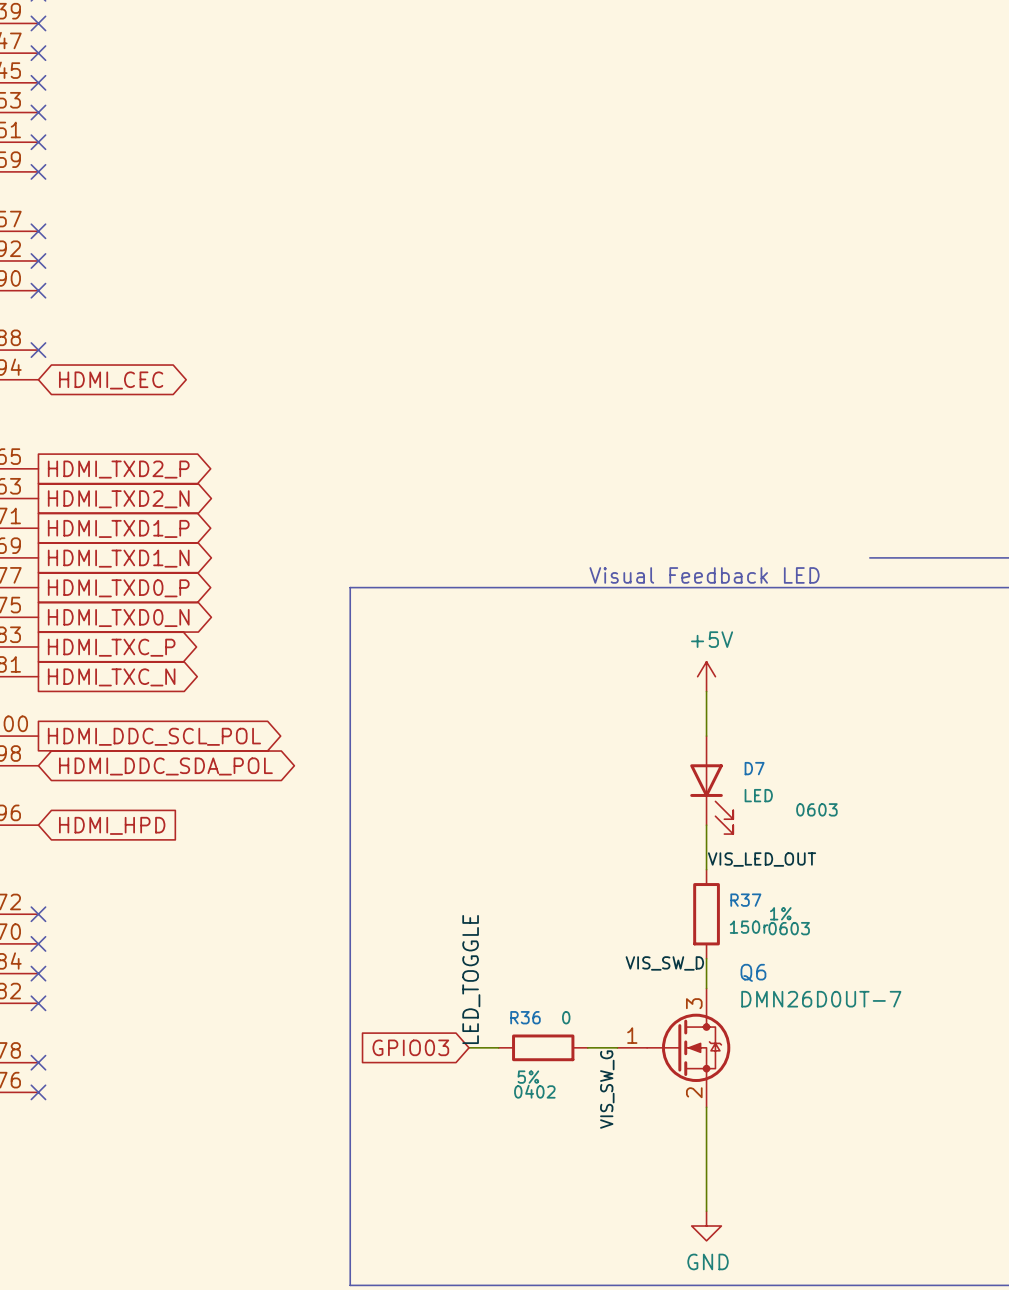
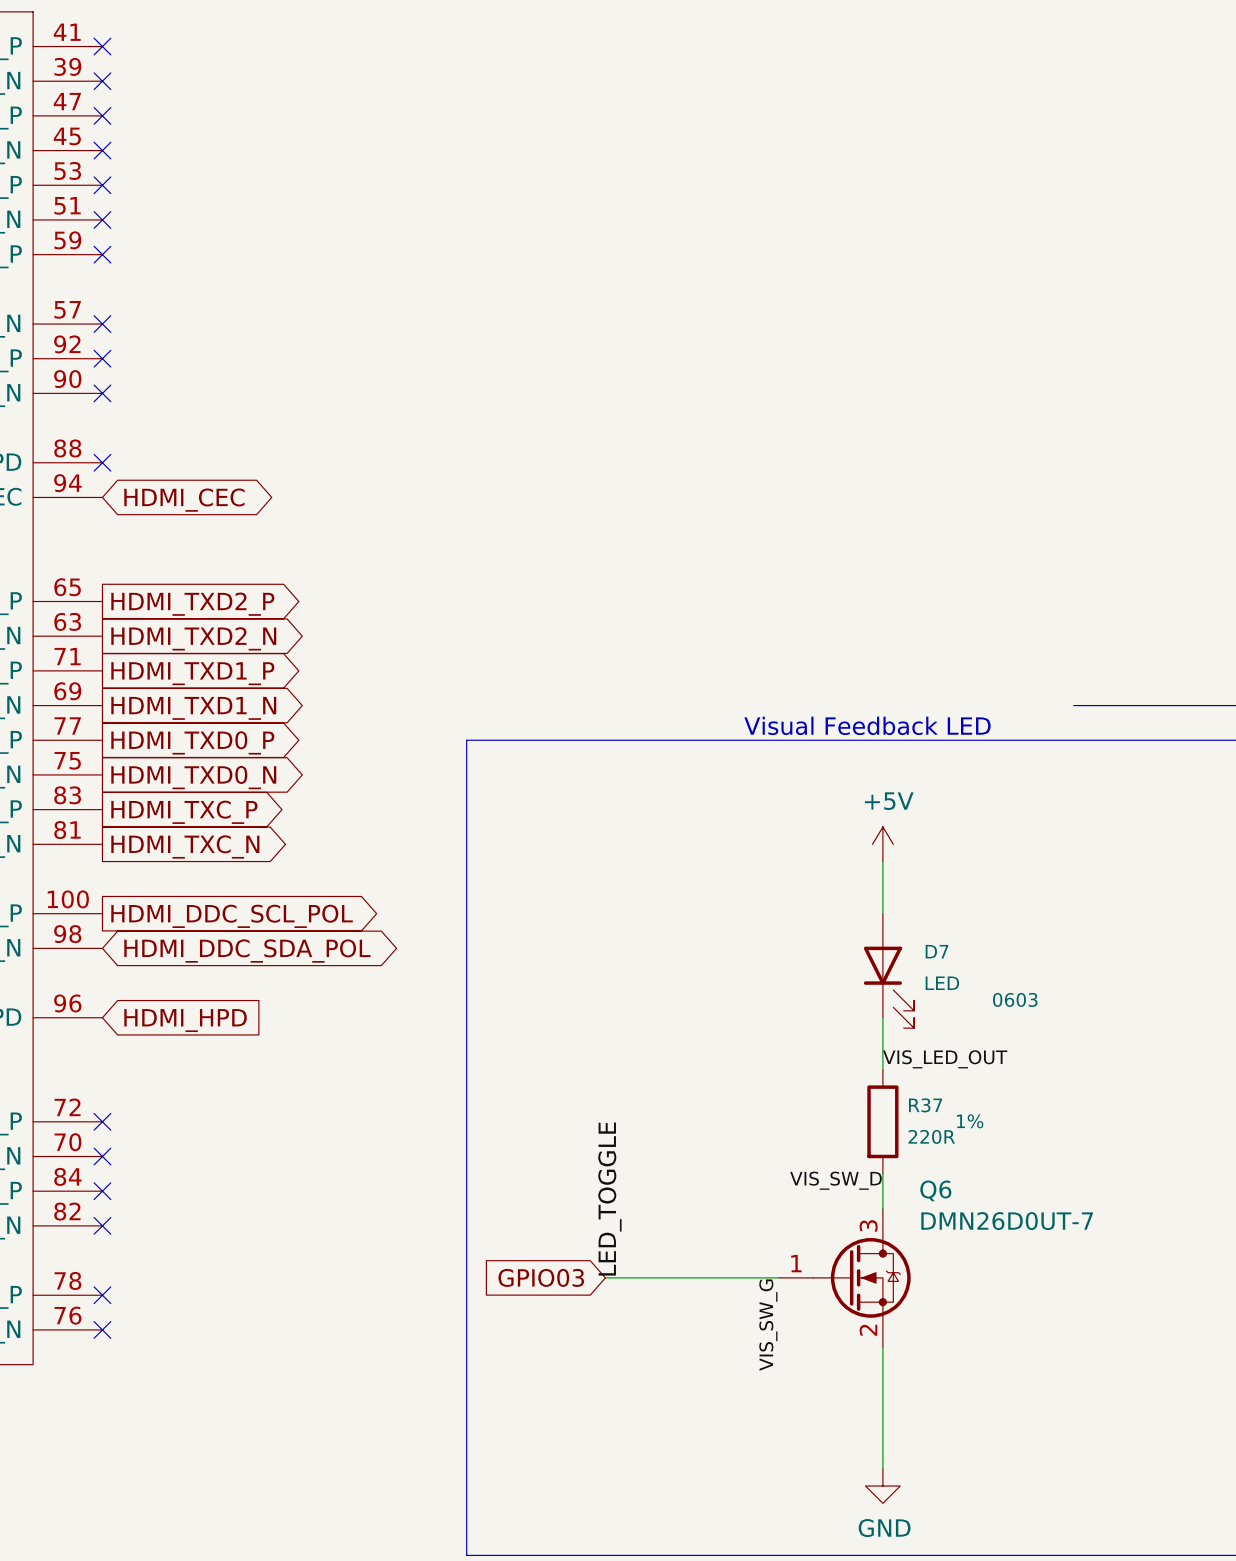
R37 value: 150r (749, 927) -> 220R (931, 1136)
R37 text: 0603 (789, 928) -> none
wire: none -> (640, 1277) (744, 1277)
R36: 0 (543, 1047) -> none

